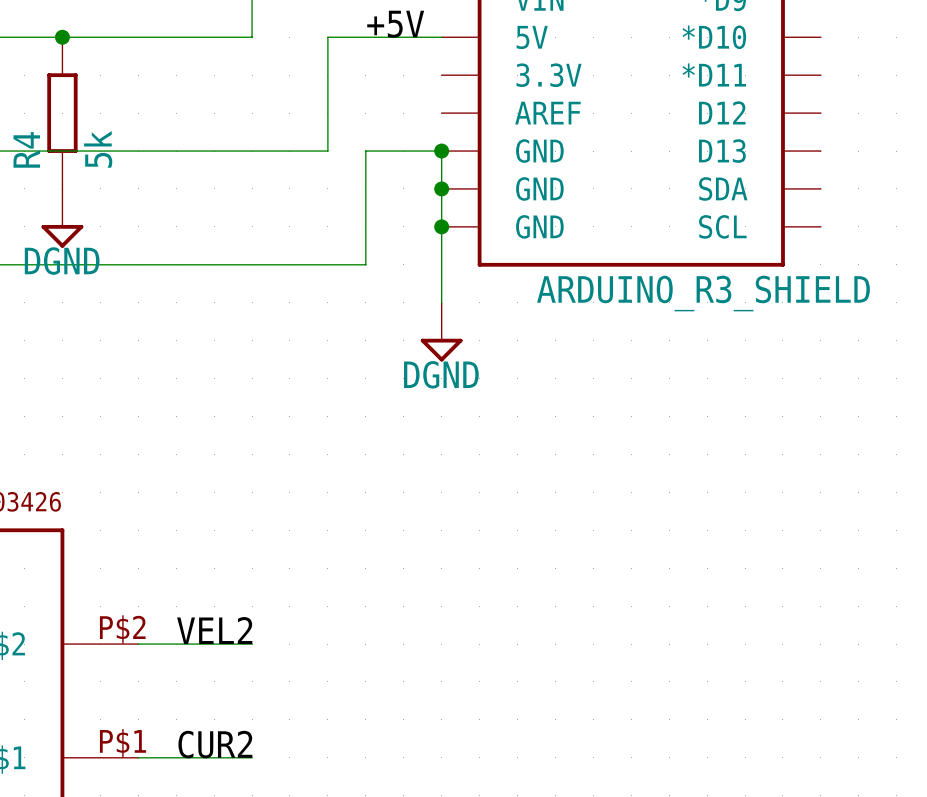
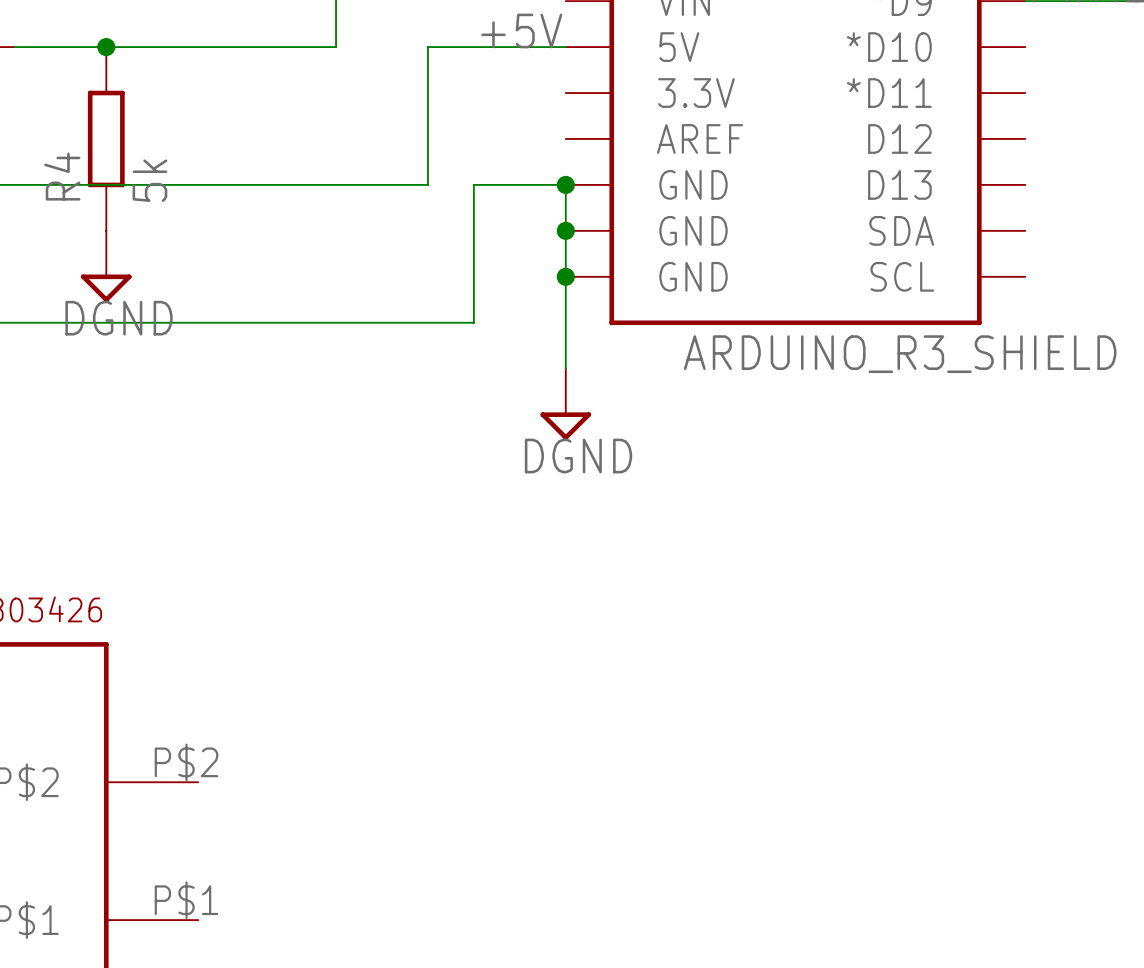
label: VEL2 (214, 630) -> none
wire: (138, 644) (252, 644) -> none
label: CUR2 (215, 744) -> none
wire: (138, 757) (252, 757) -> none

